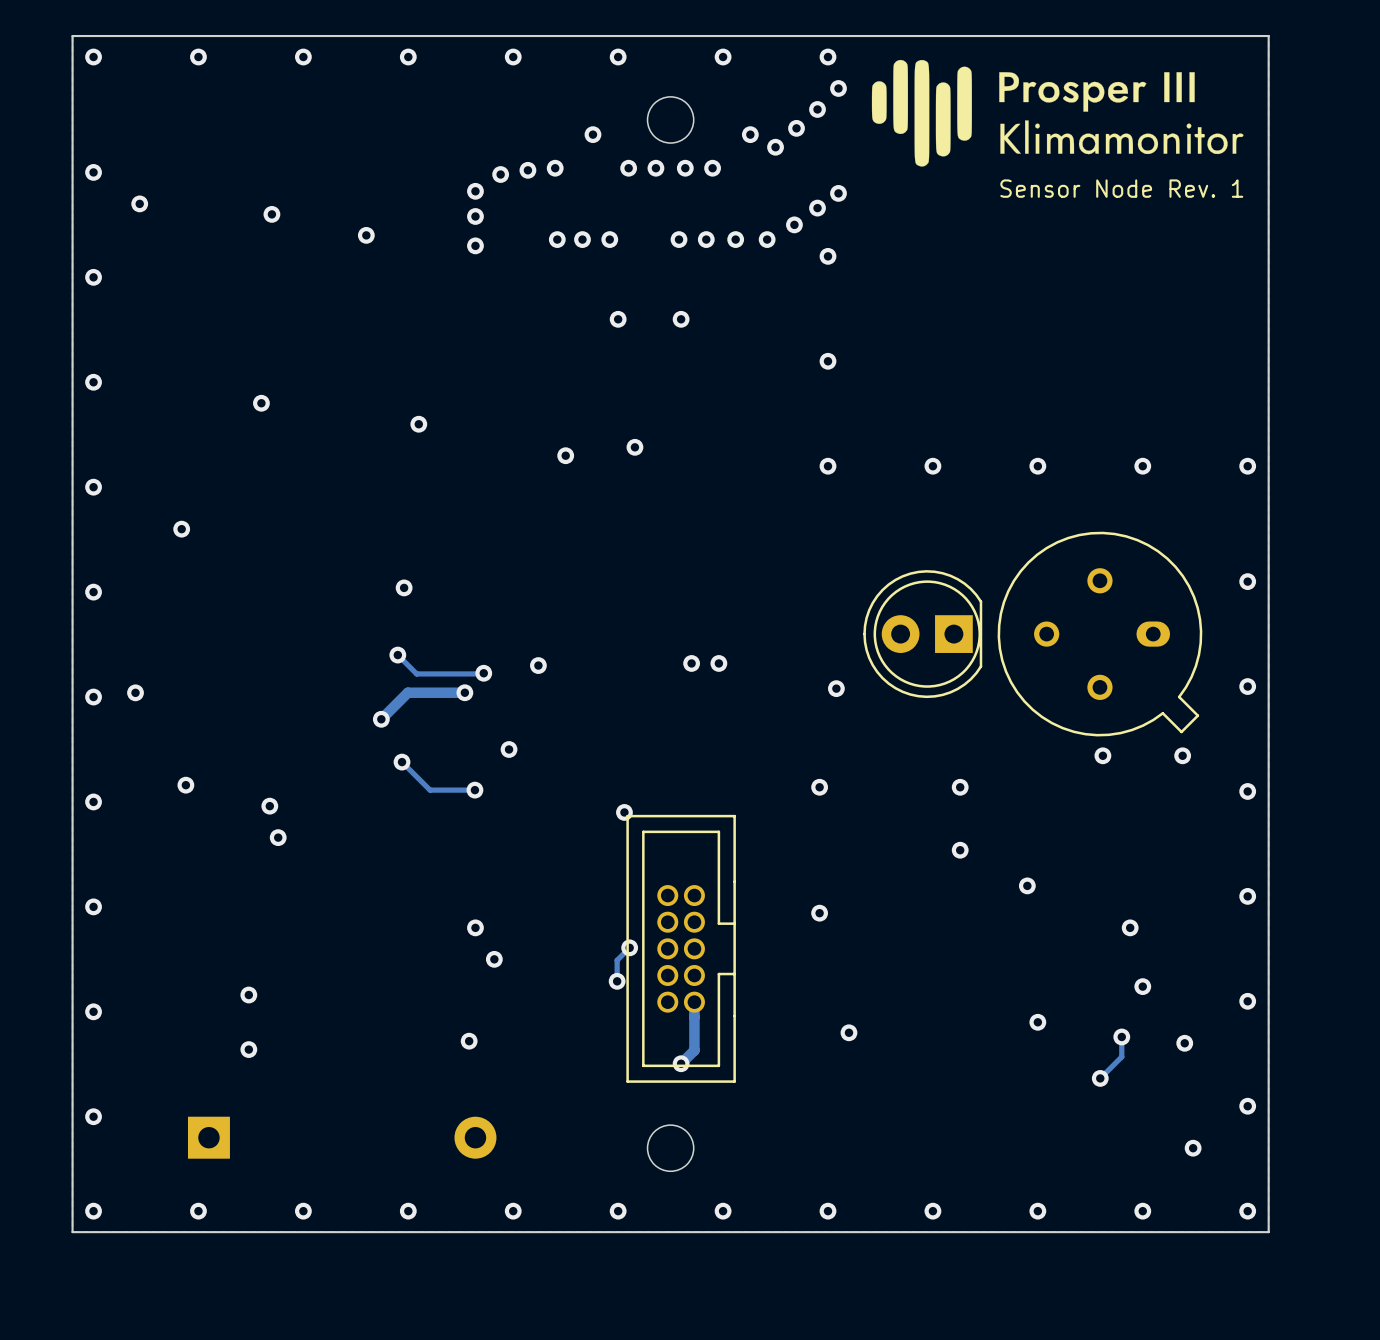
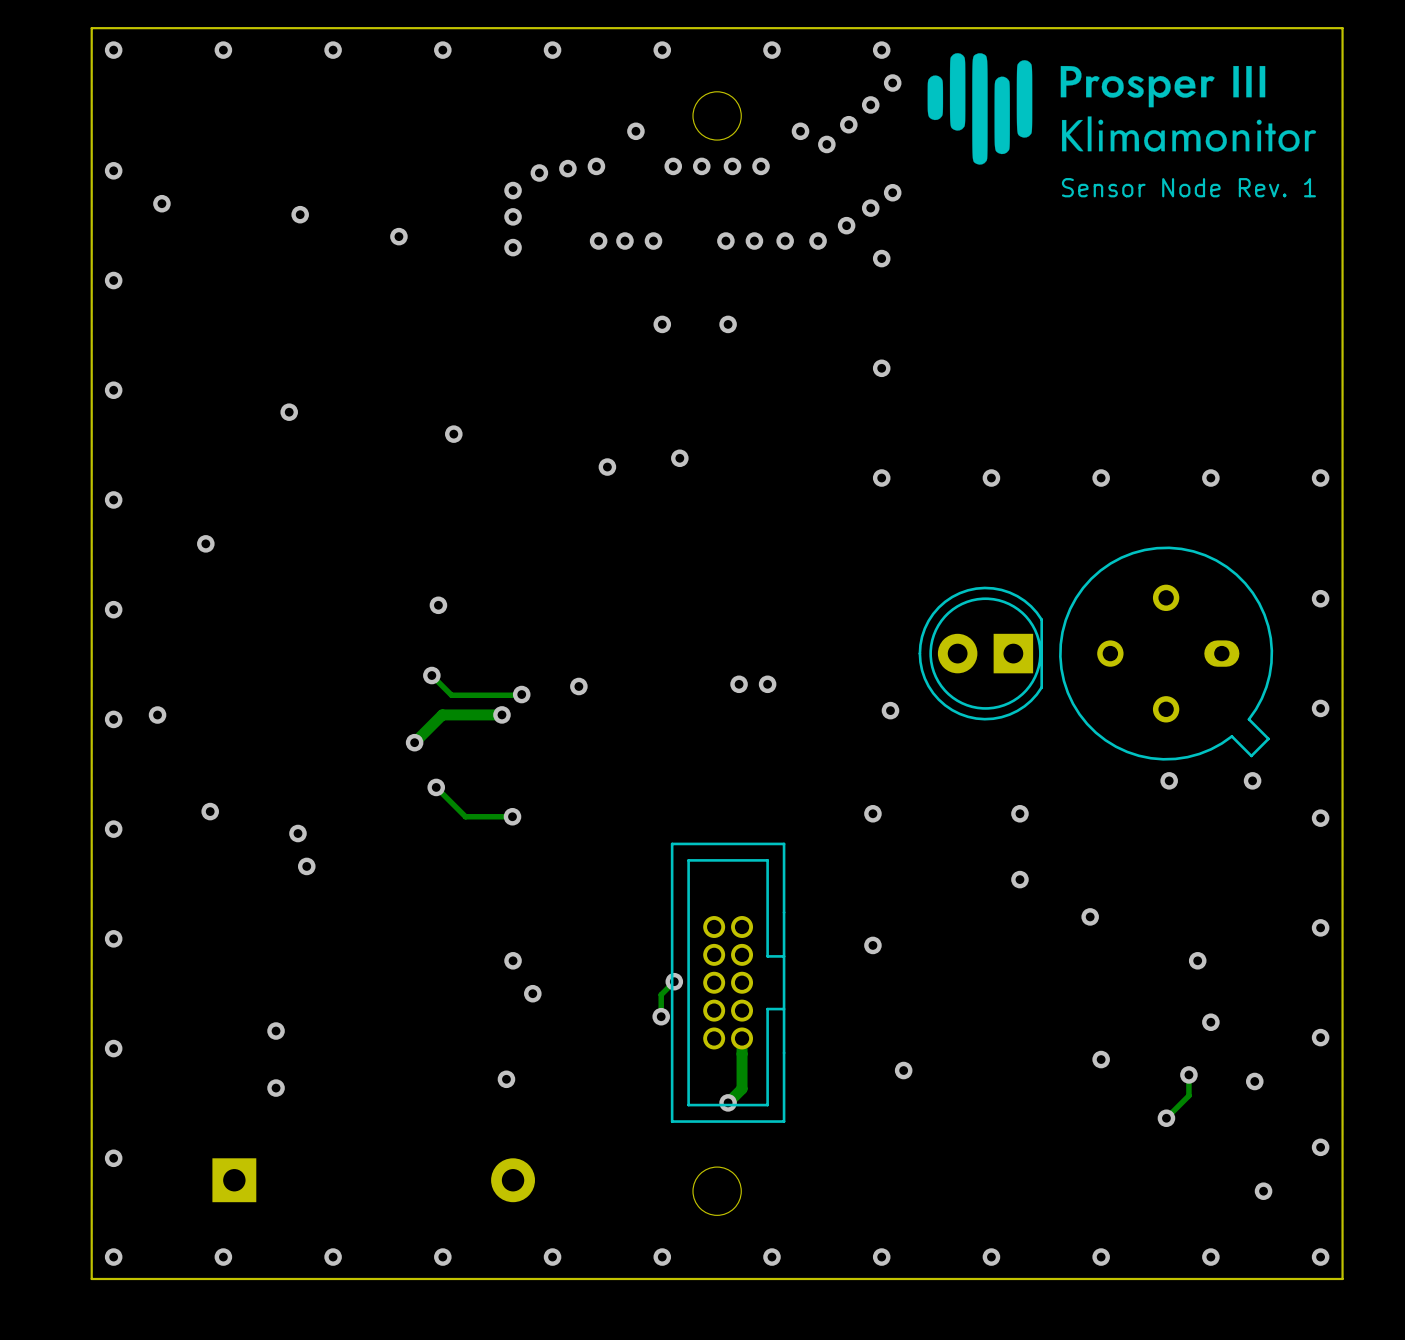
via: (509, 749) -> none
via: (624, 812) -> none

